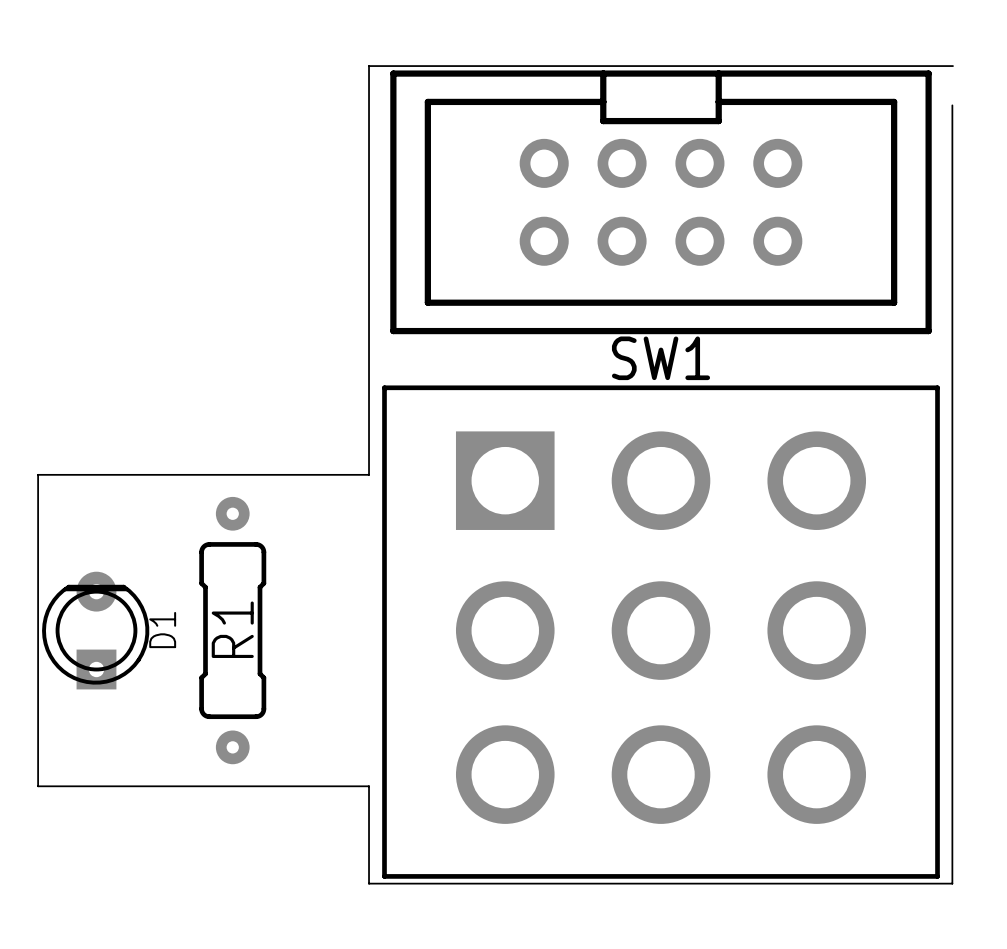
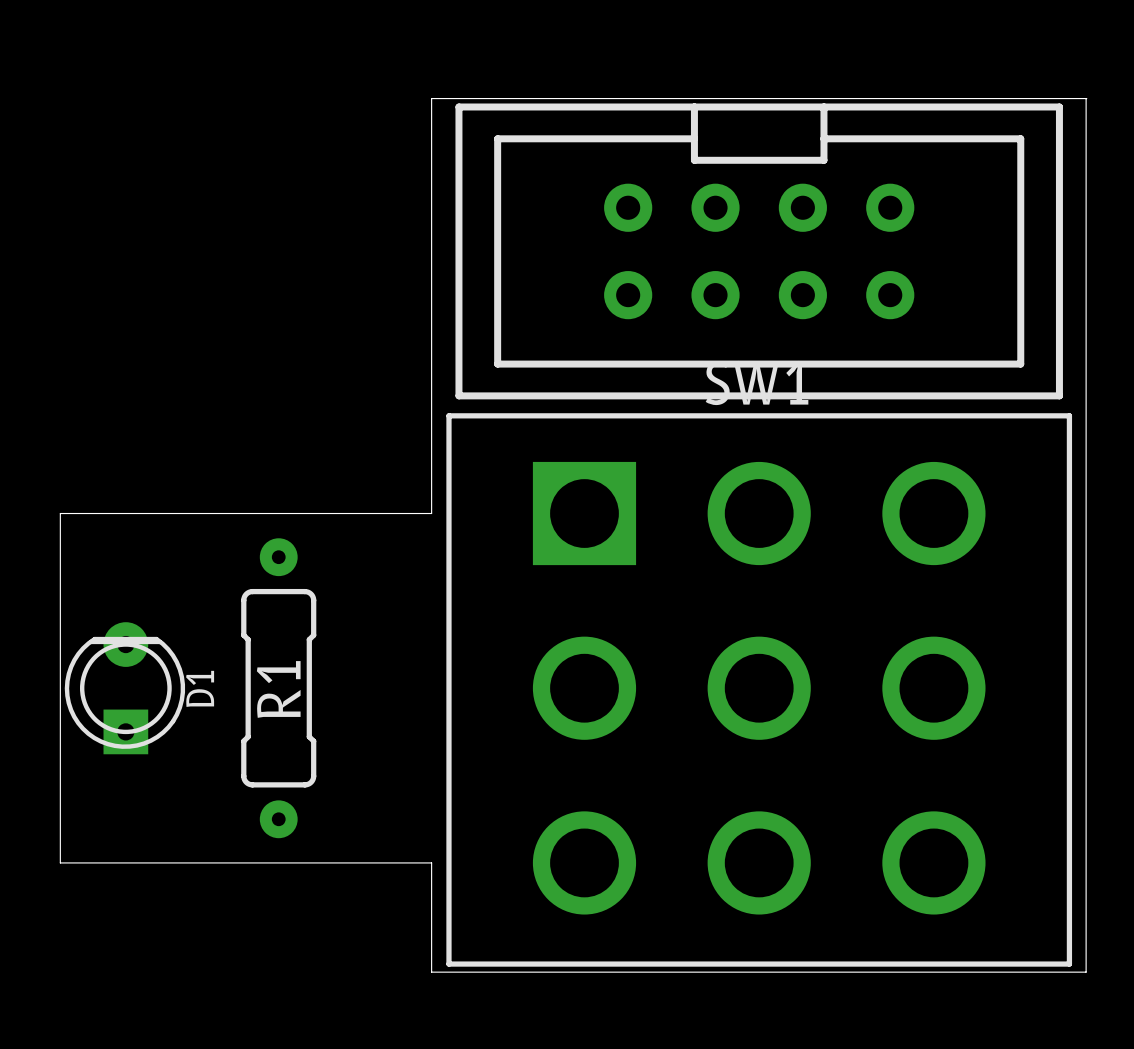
board edge: (952, 66) (369, 66) (369, 104) -> (1086, 98) (431, 98)
part: (661, 202) -> none
part: none -> (759, 251)
SW1 footprint: [382, 385, 940, 879] -> [446, 413, 1073, 967]

